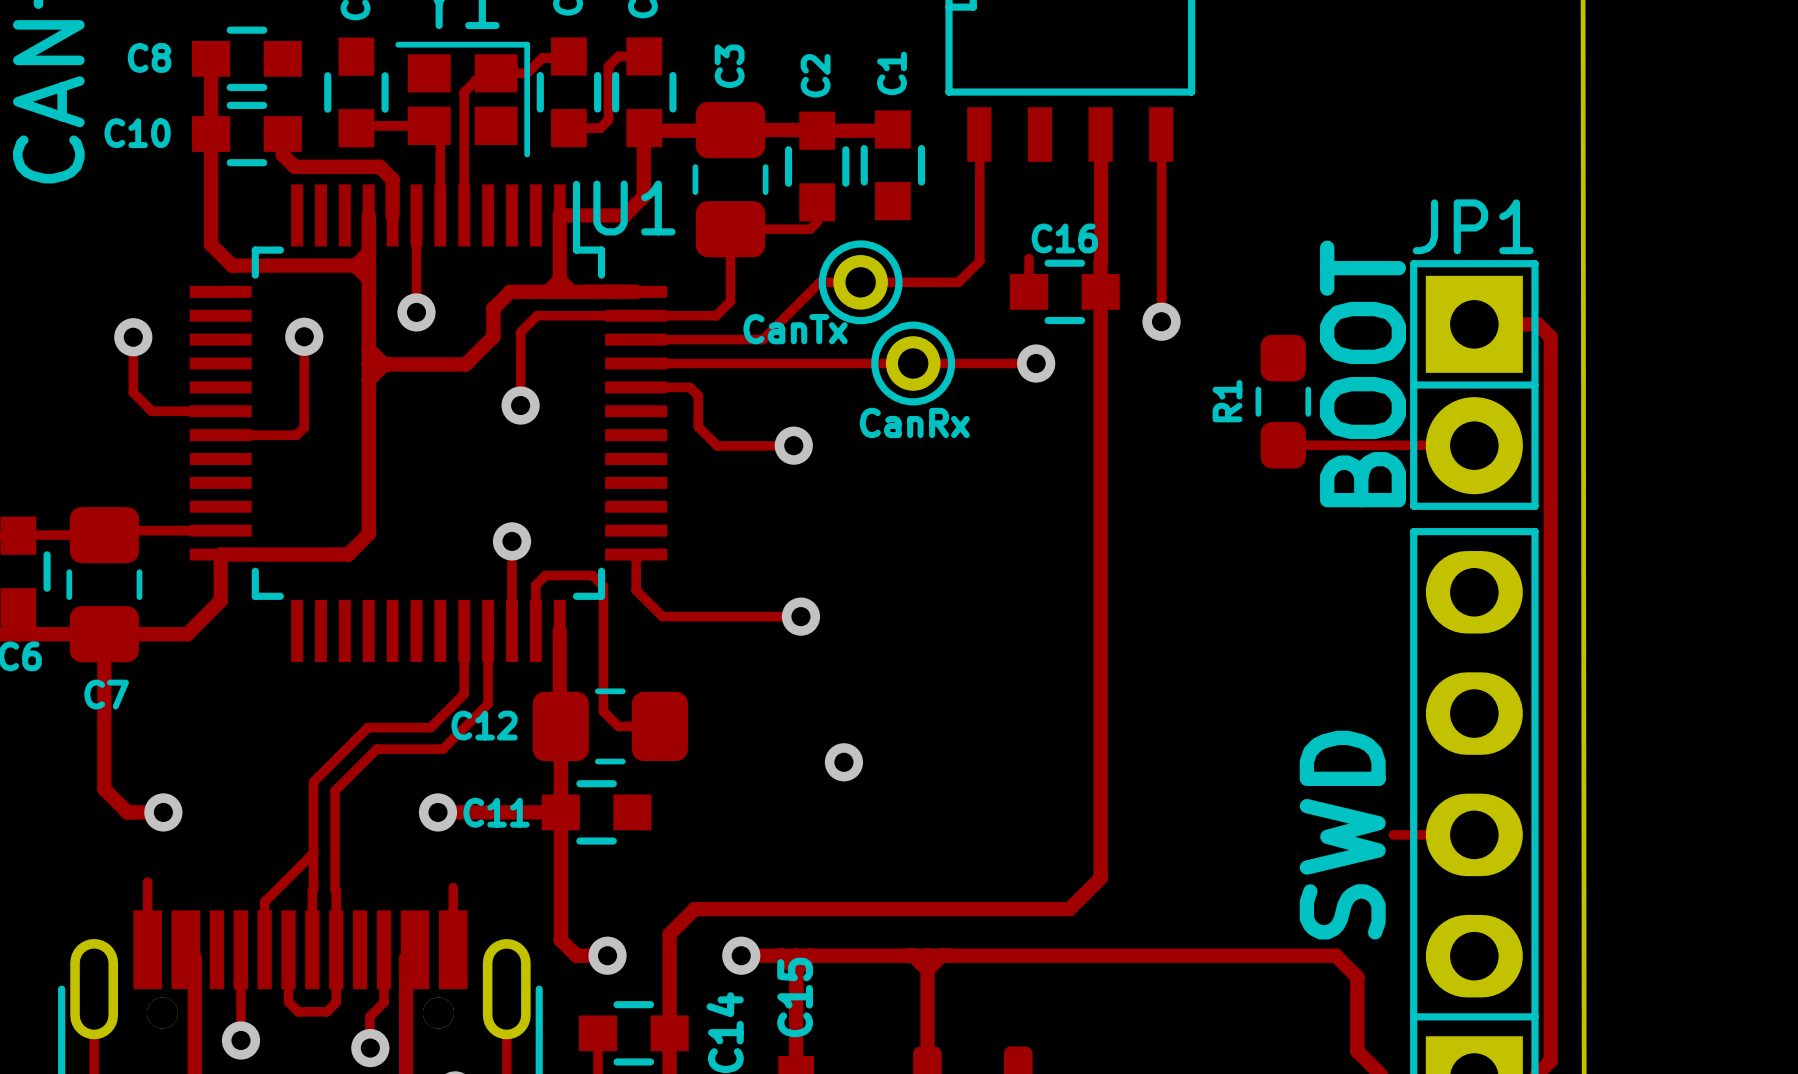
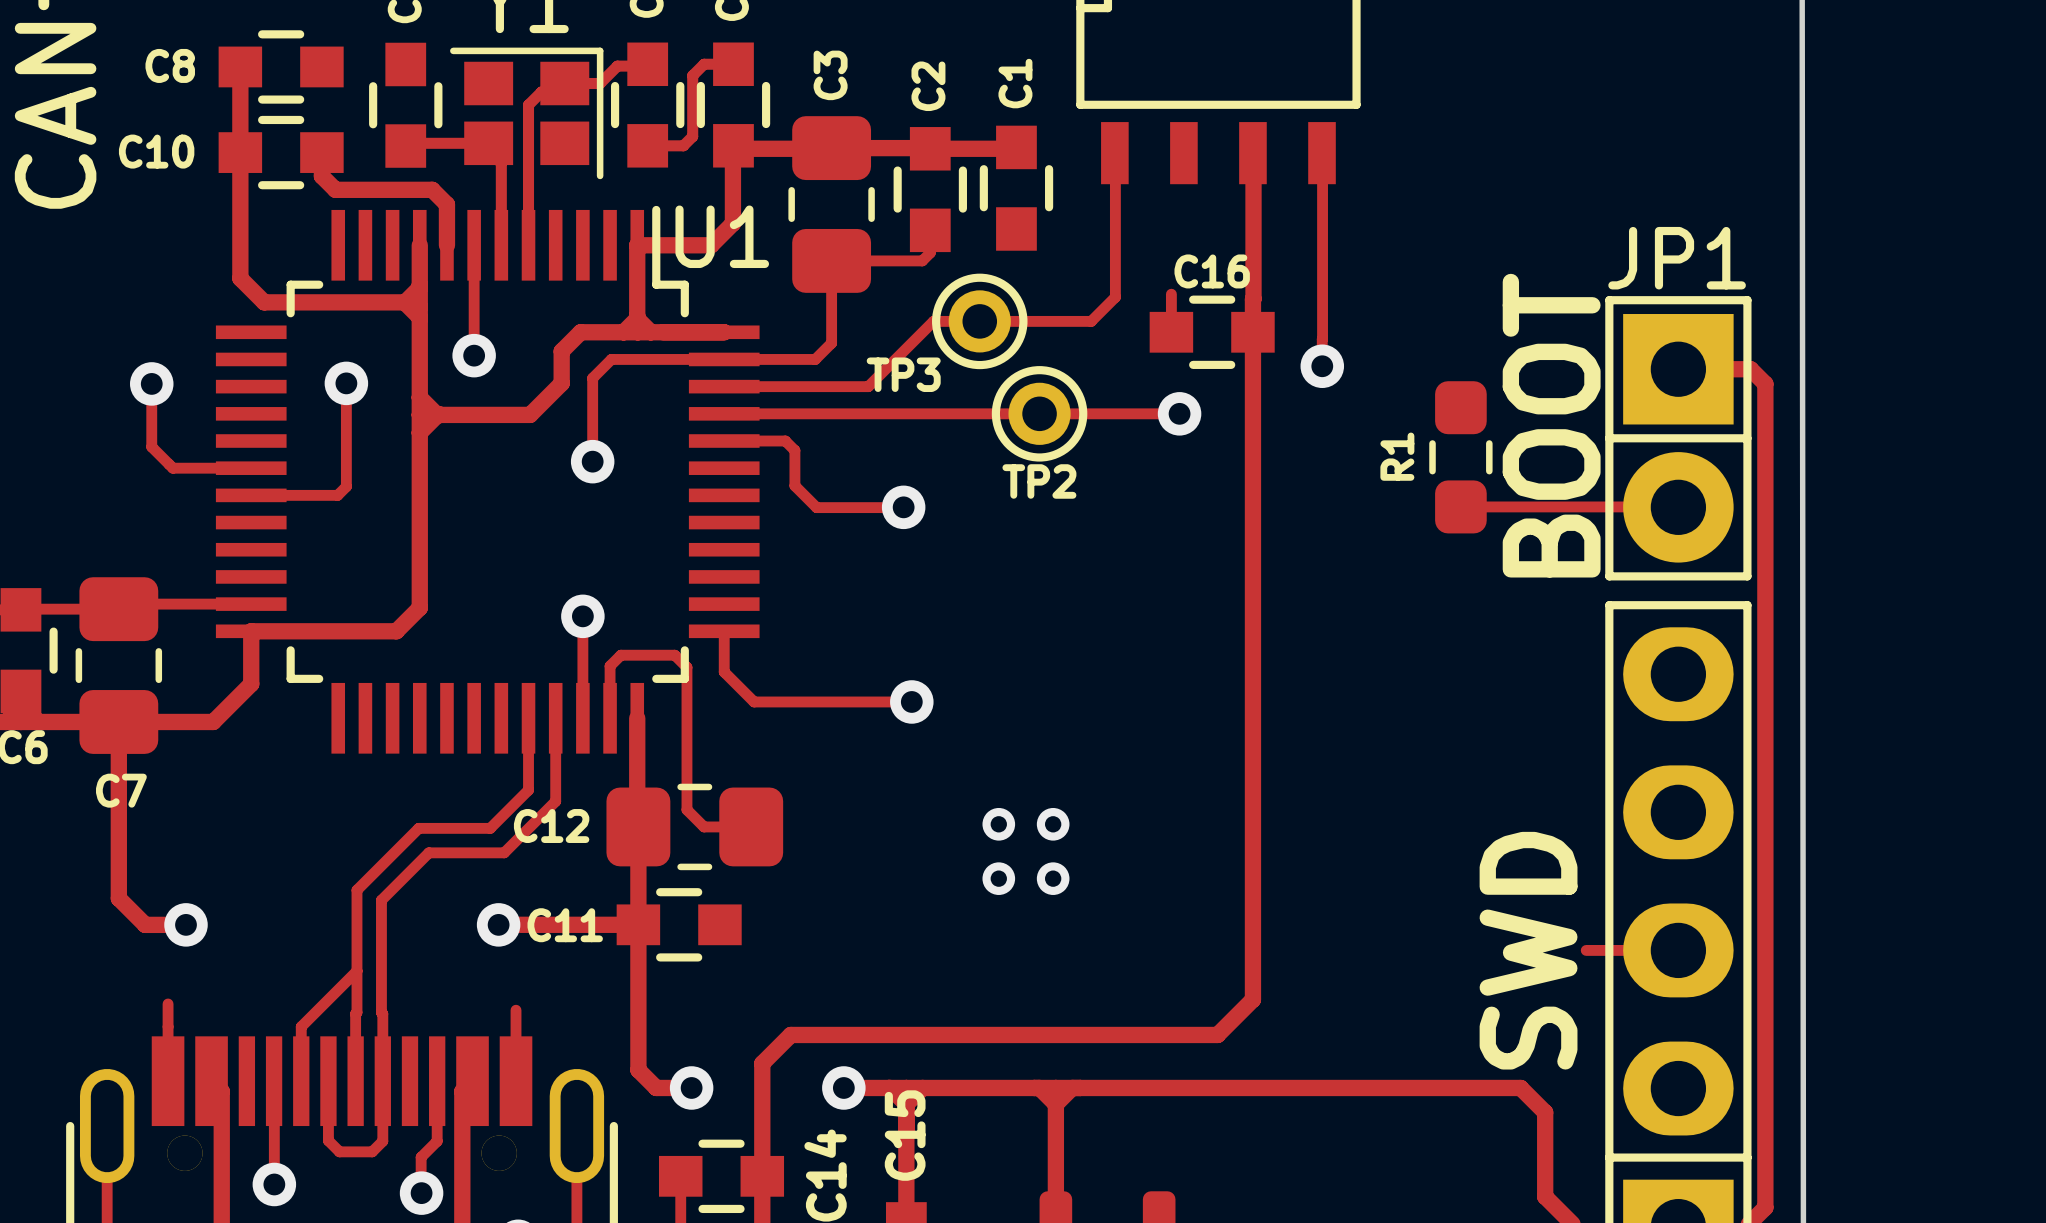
CanTx name: CanTx (795, 329) -> TP3 (903, 374)
CanRx name: CanRx (914, 422) -> TP2 (1039, 481)
via: none -> (998, 824)
via: none -> (1053, 824)
via position: (843, 762) -> (998, 878)
via: none -> (1053, 878)

